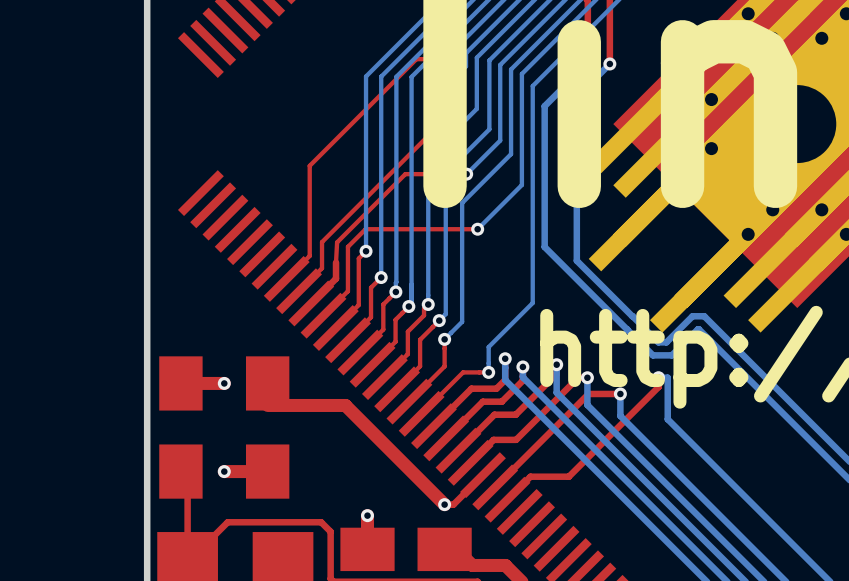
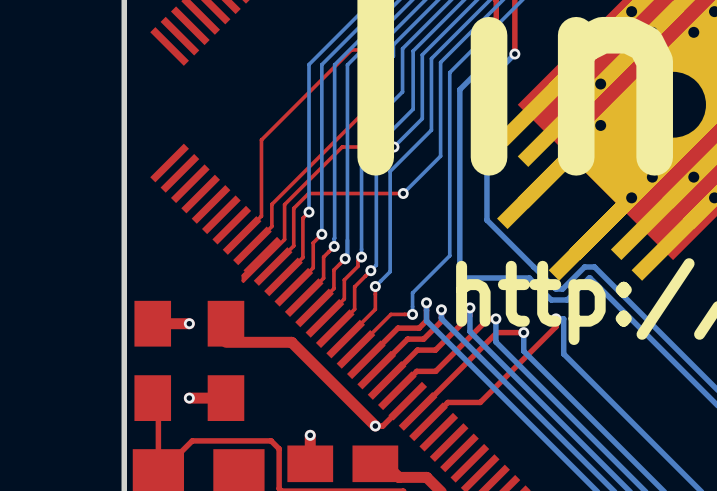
top track: (337, 242) (336, 278) (311, 303) -> (284, 204) (284, 239) (243, 280) (243, 275) (262, 256)
bottom track: (544, 247) (627, 329) -> (459, 208) (459, 277) (529, 277)

